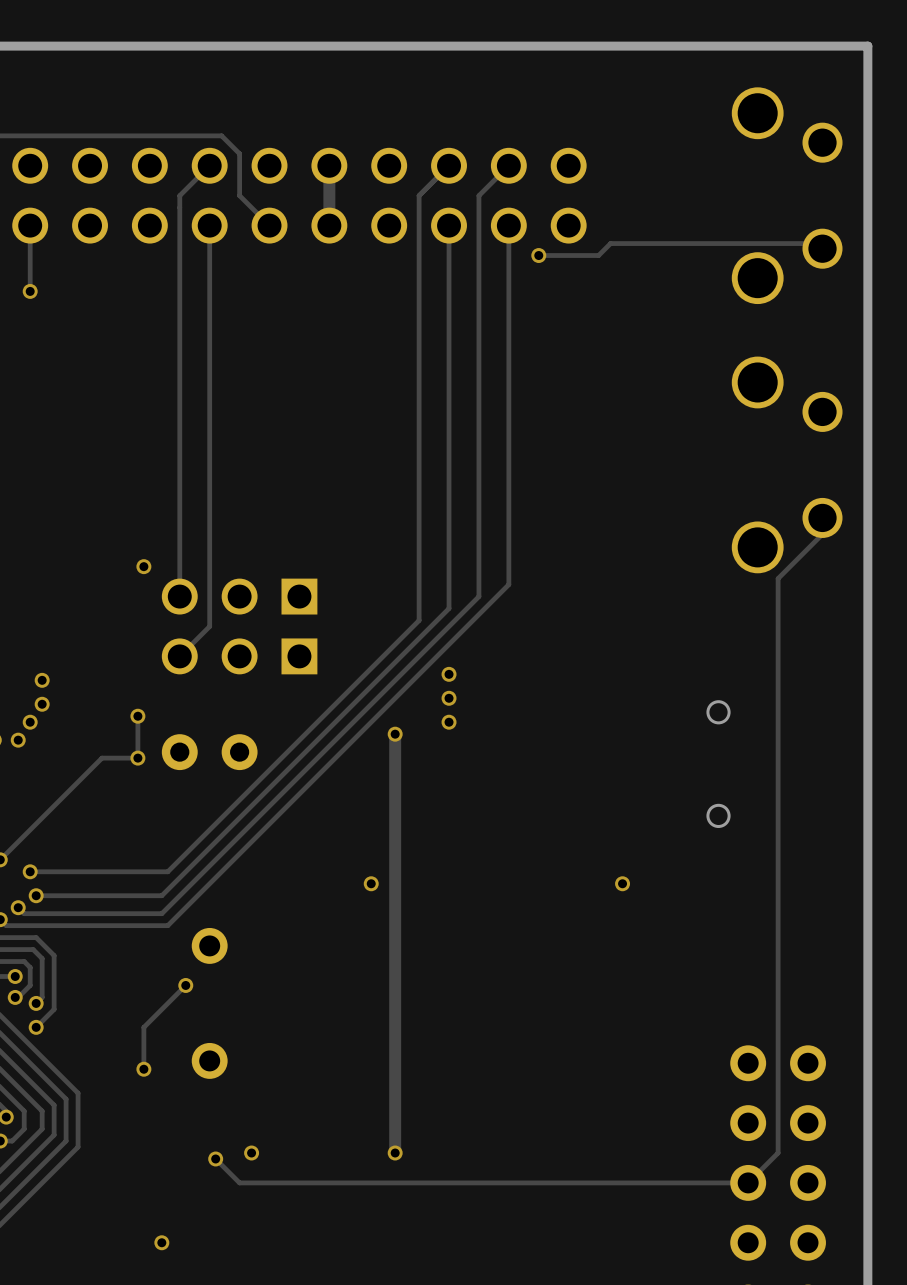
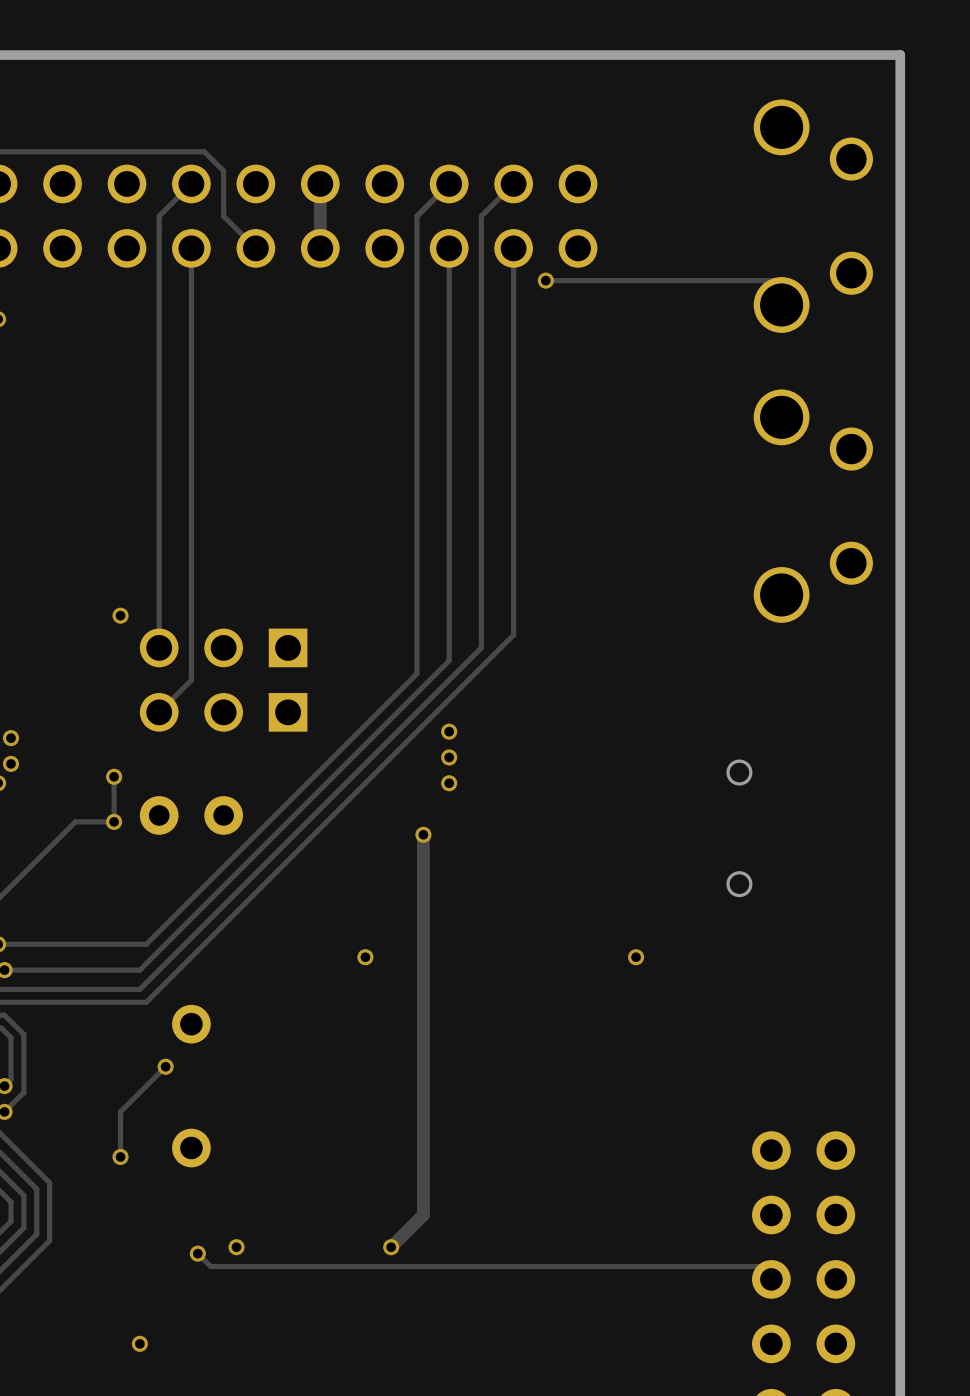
track: (822, 248) (817, 243) (610, 243) (598, 255) -> (803, 311) (772, 280) (610, 280)
track: (822, 517) (822, 534) (778, 578) (778, 1153) (748, 1182) (239, 1182) (227, 1170) -> (771, 1279) (758, 1266) (210, 1266)
track: (395, 734) (395, 1153) -> (423, 834) (423, 1214) (391, 1247)
via position: (395, 734) -> (423, 834)

